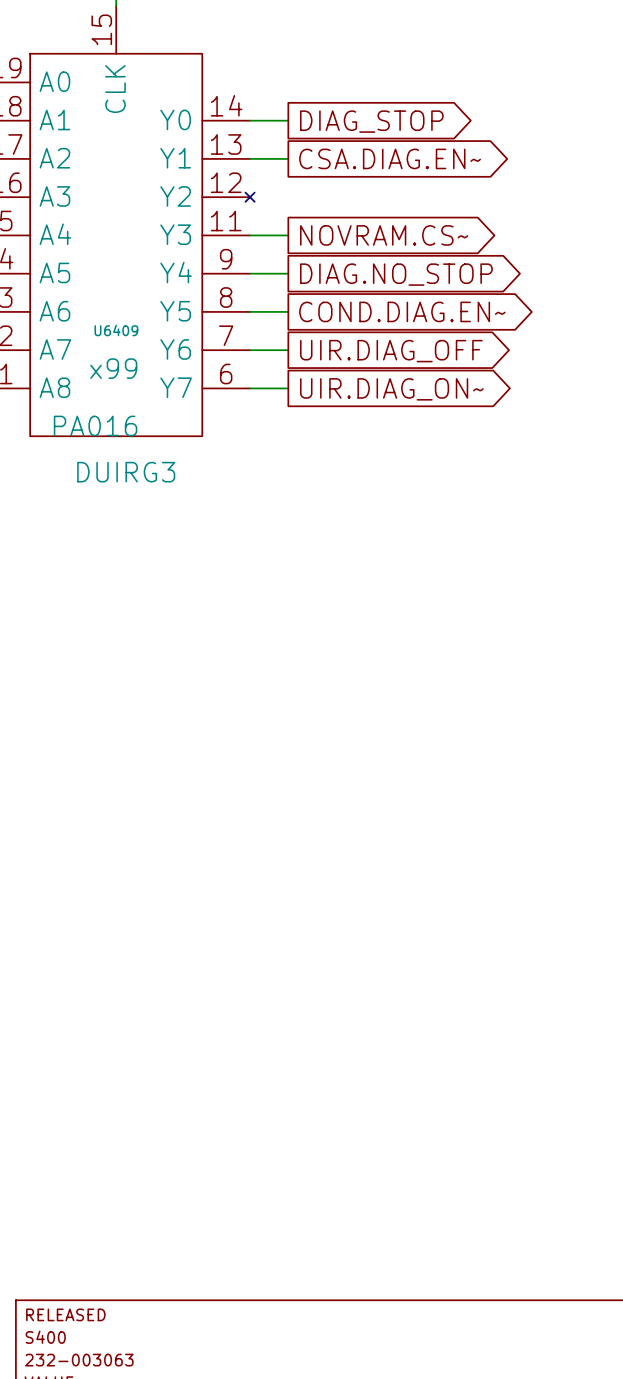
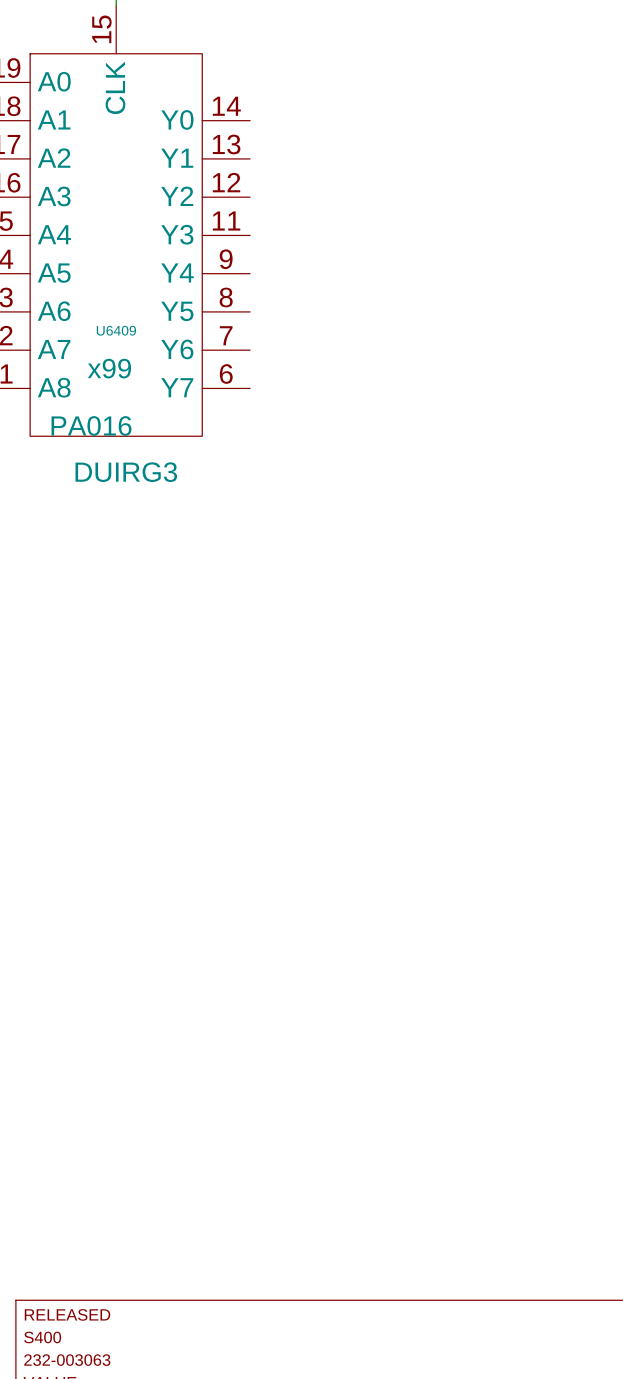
wire: (250, 120) (288, 120) -> none
global label: DIAG_STOP (371, 121) -> none
wire: (250, 158) (288, 158) -> none
global label: CSA.DIAG.EN~ (390, 158) -> none
no-connect mark: (250, 197) -> none
wire: (250, 235) (288, 235) -> none
global label: NOVRAM.CS~ (384, 235) -> none
wire: (250, 273) (288, 273) -> none
global label: DIAG.NO_STOP (396, 274) -> none
wire: (250, 311) (288, 311) -> none
global label: COND.DIAG.EN~ (402, 311) -> none
wire: (250, 350) (288, 350) -> none
global label: UIR.DIAG_OFF (391, 351) -> none
wire: (250, 388) (288, 388) -> none
global label: UIR.DIAG_ON~ (391, 389) -> none

